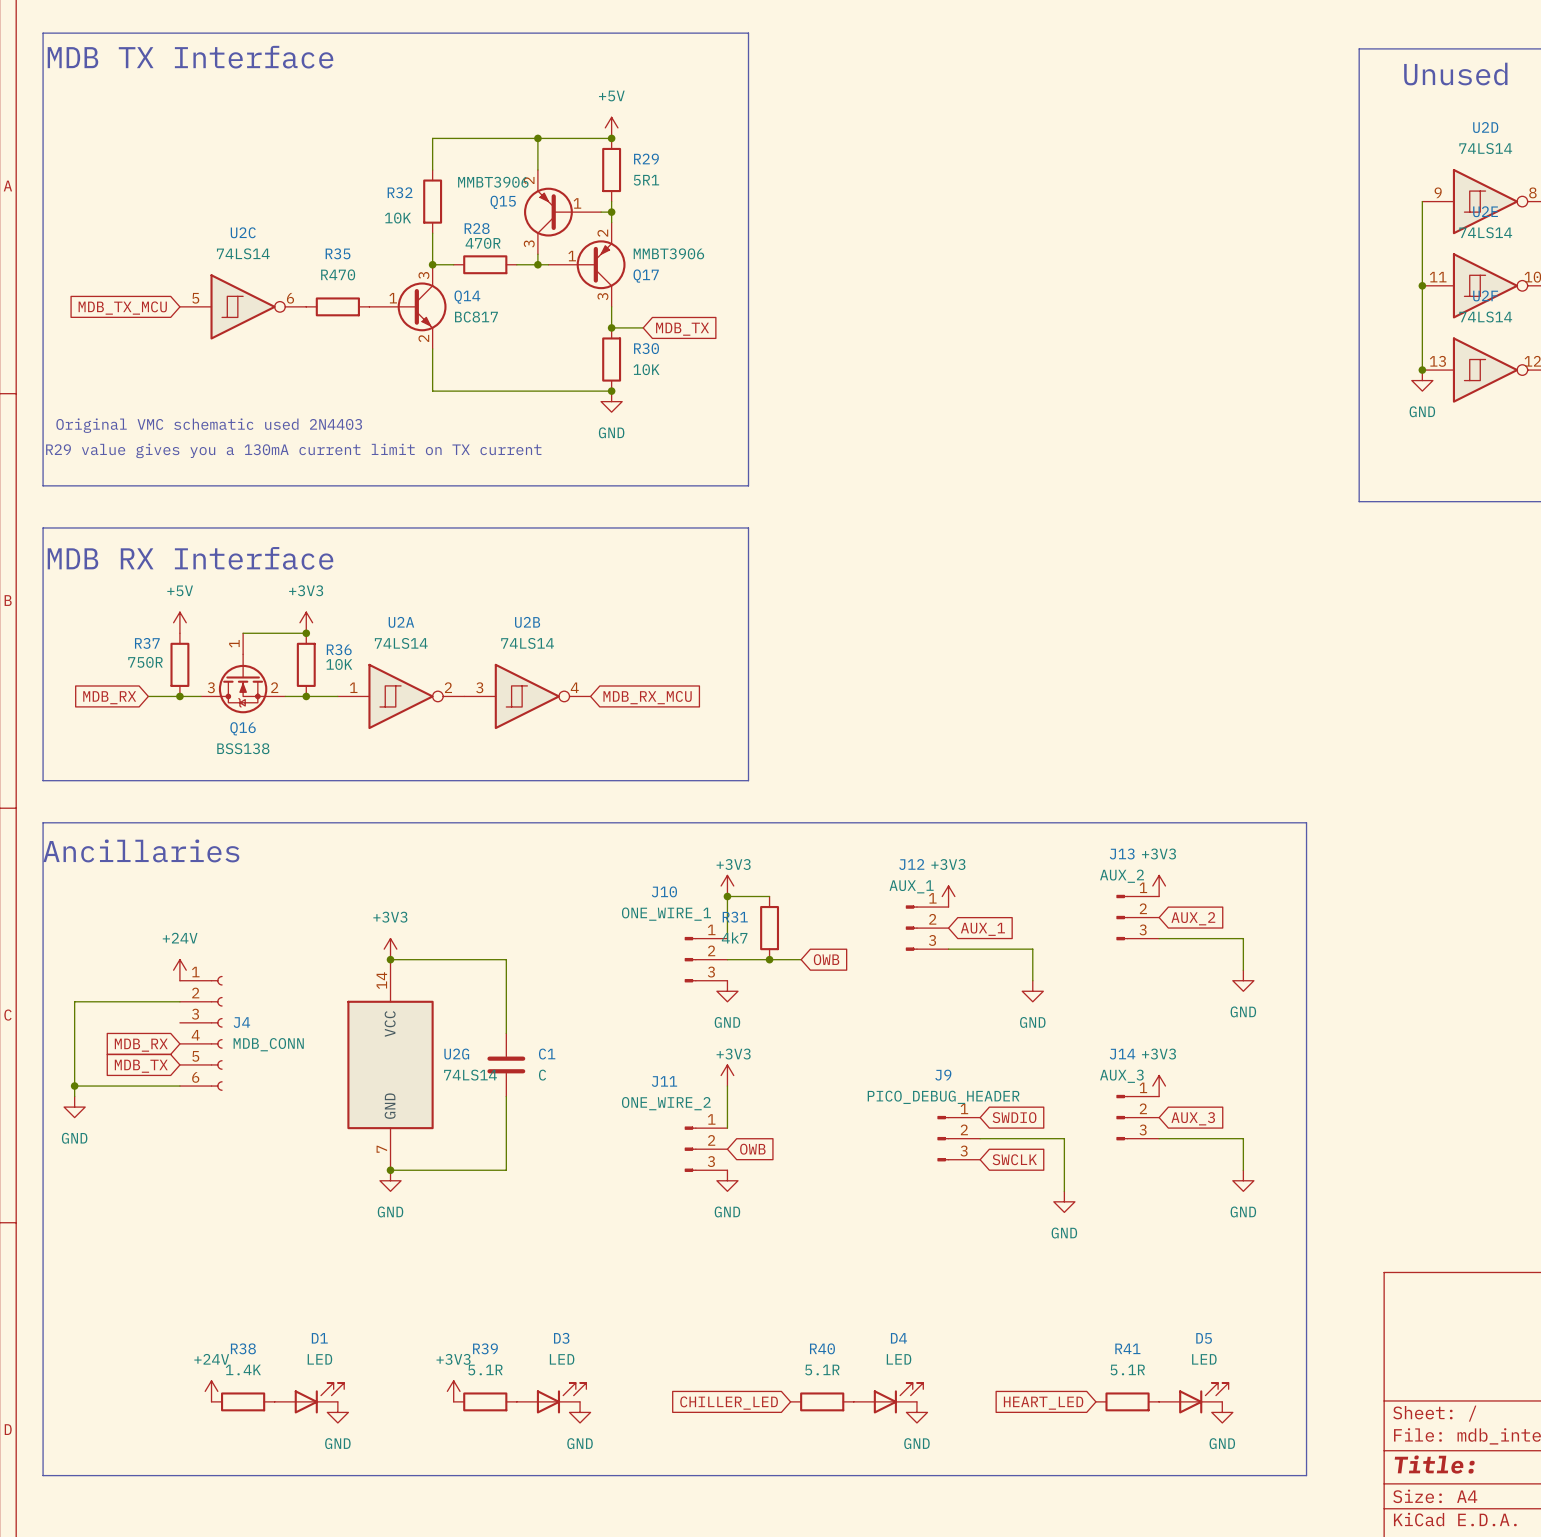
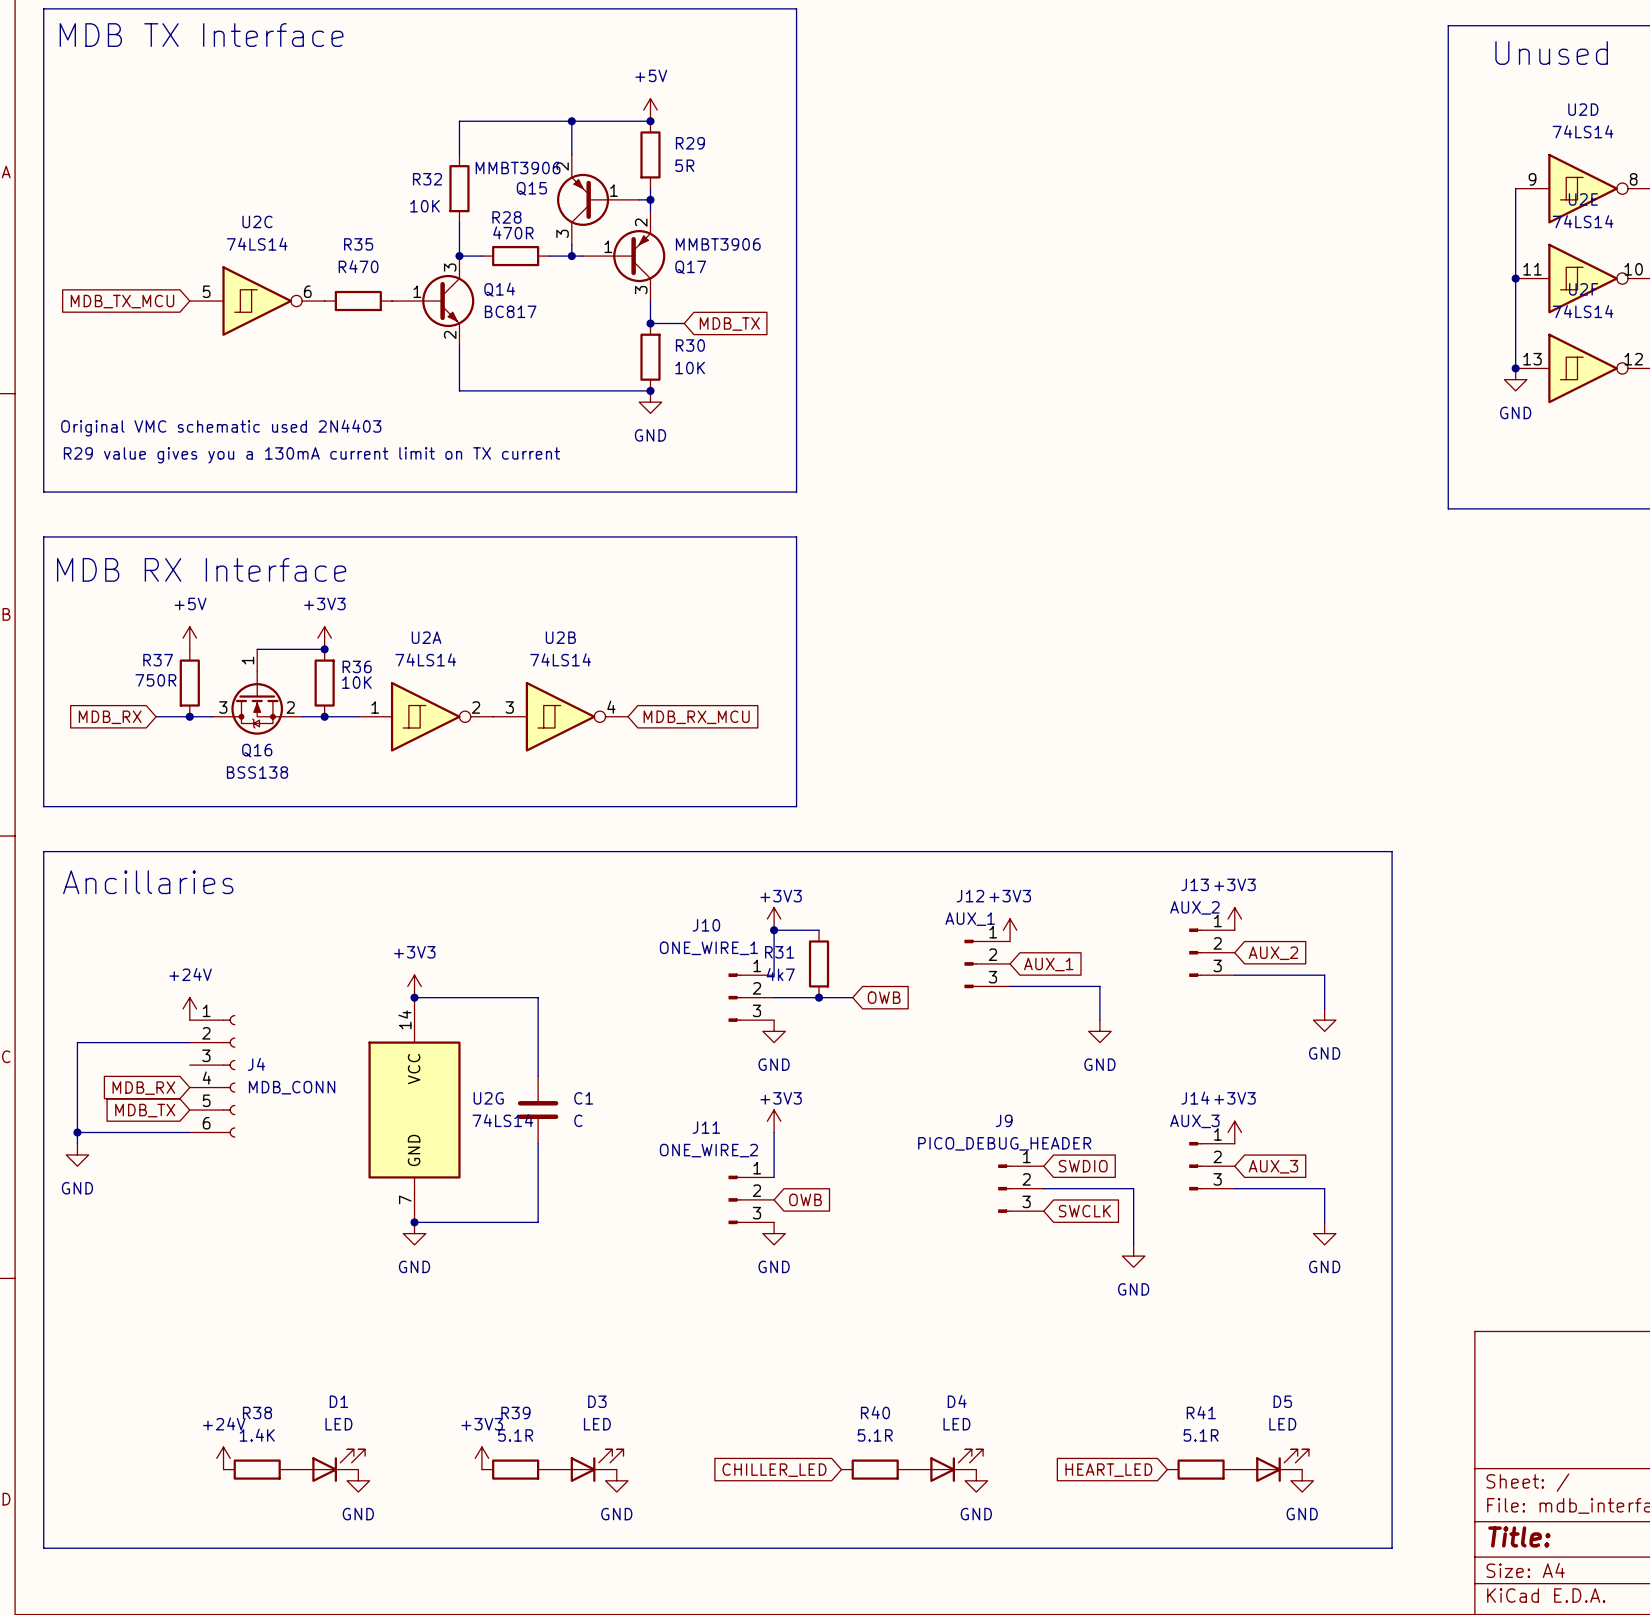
R29 value: 5R1 (646, 180) -> 5R (684, 165)

